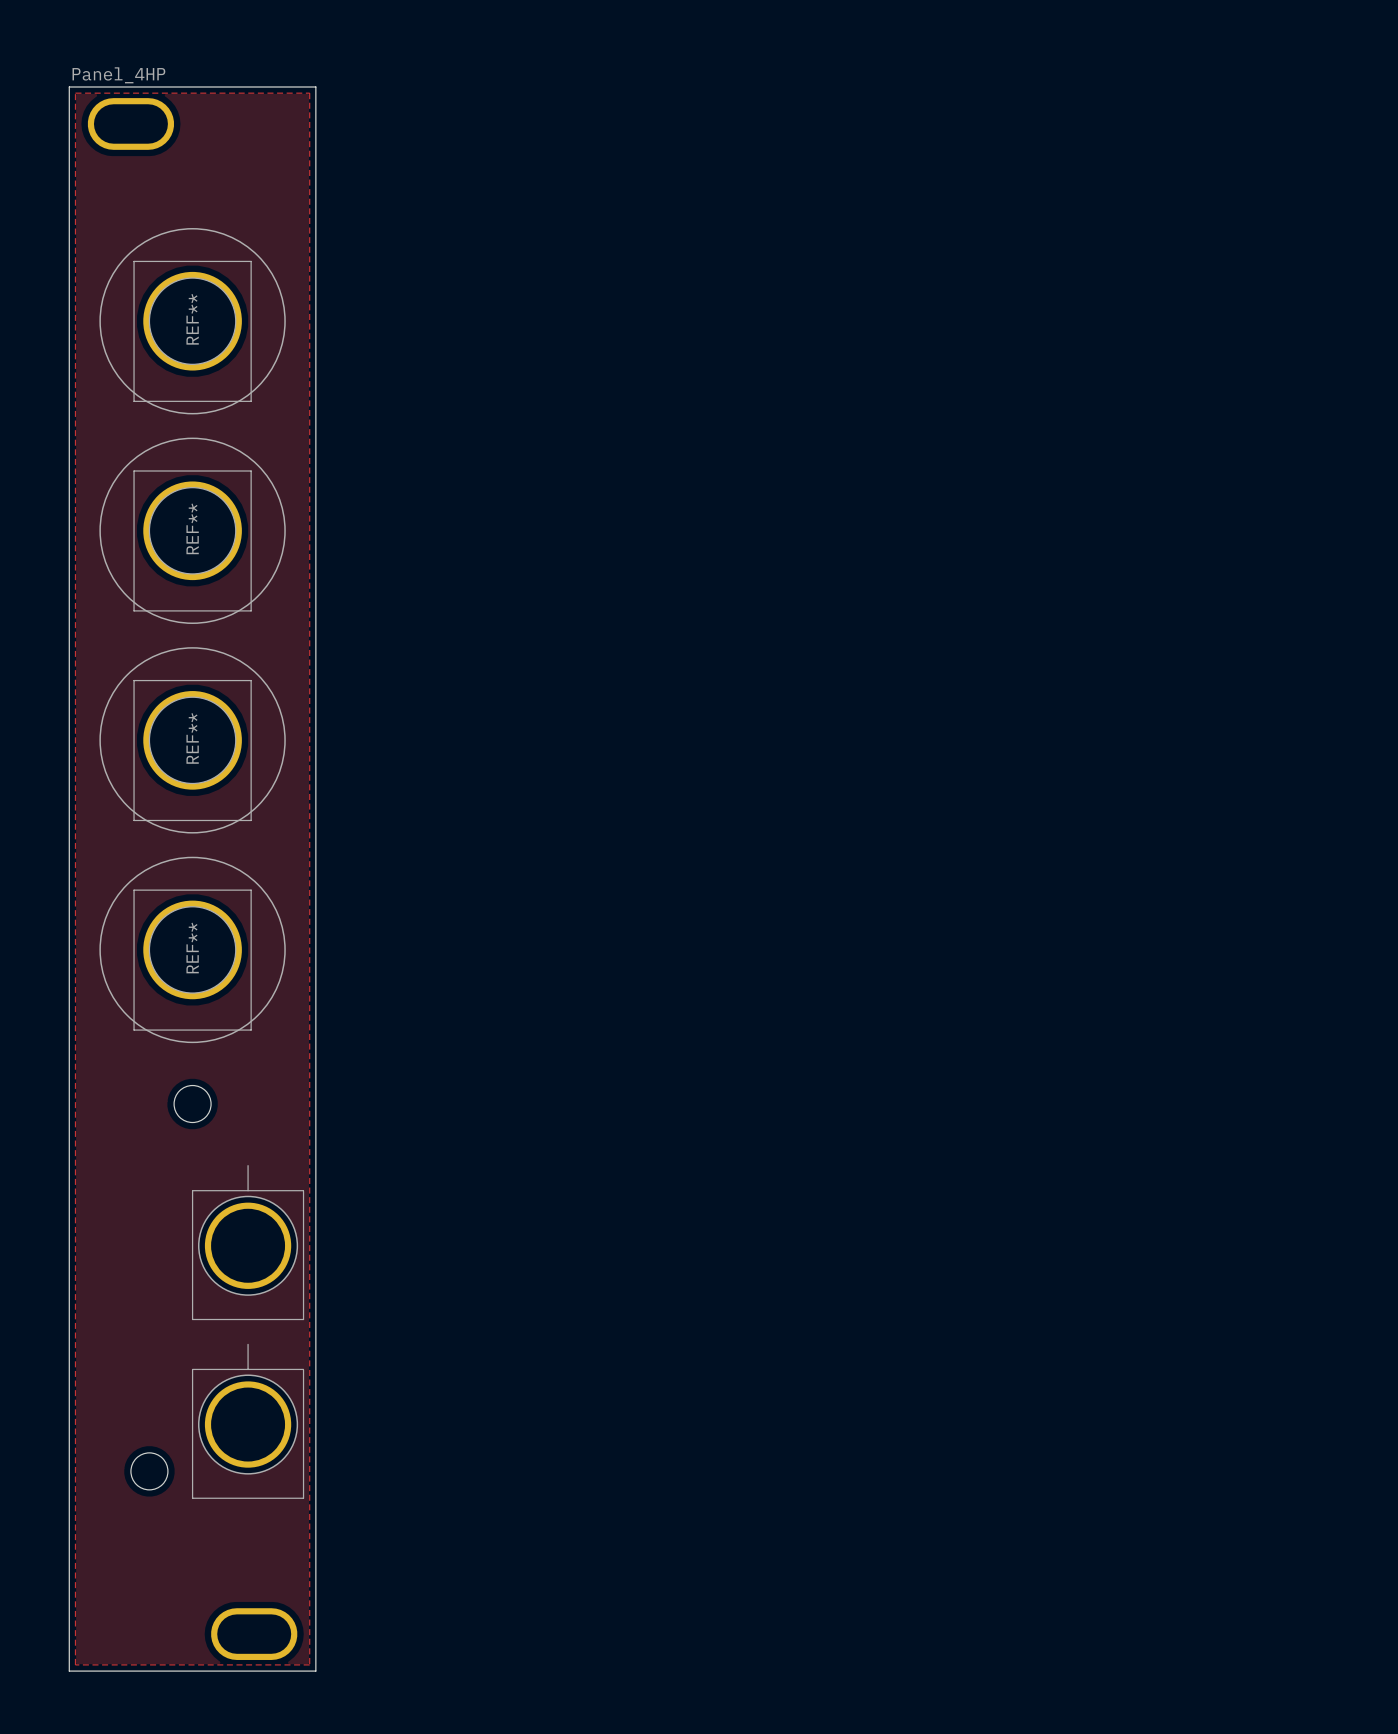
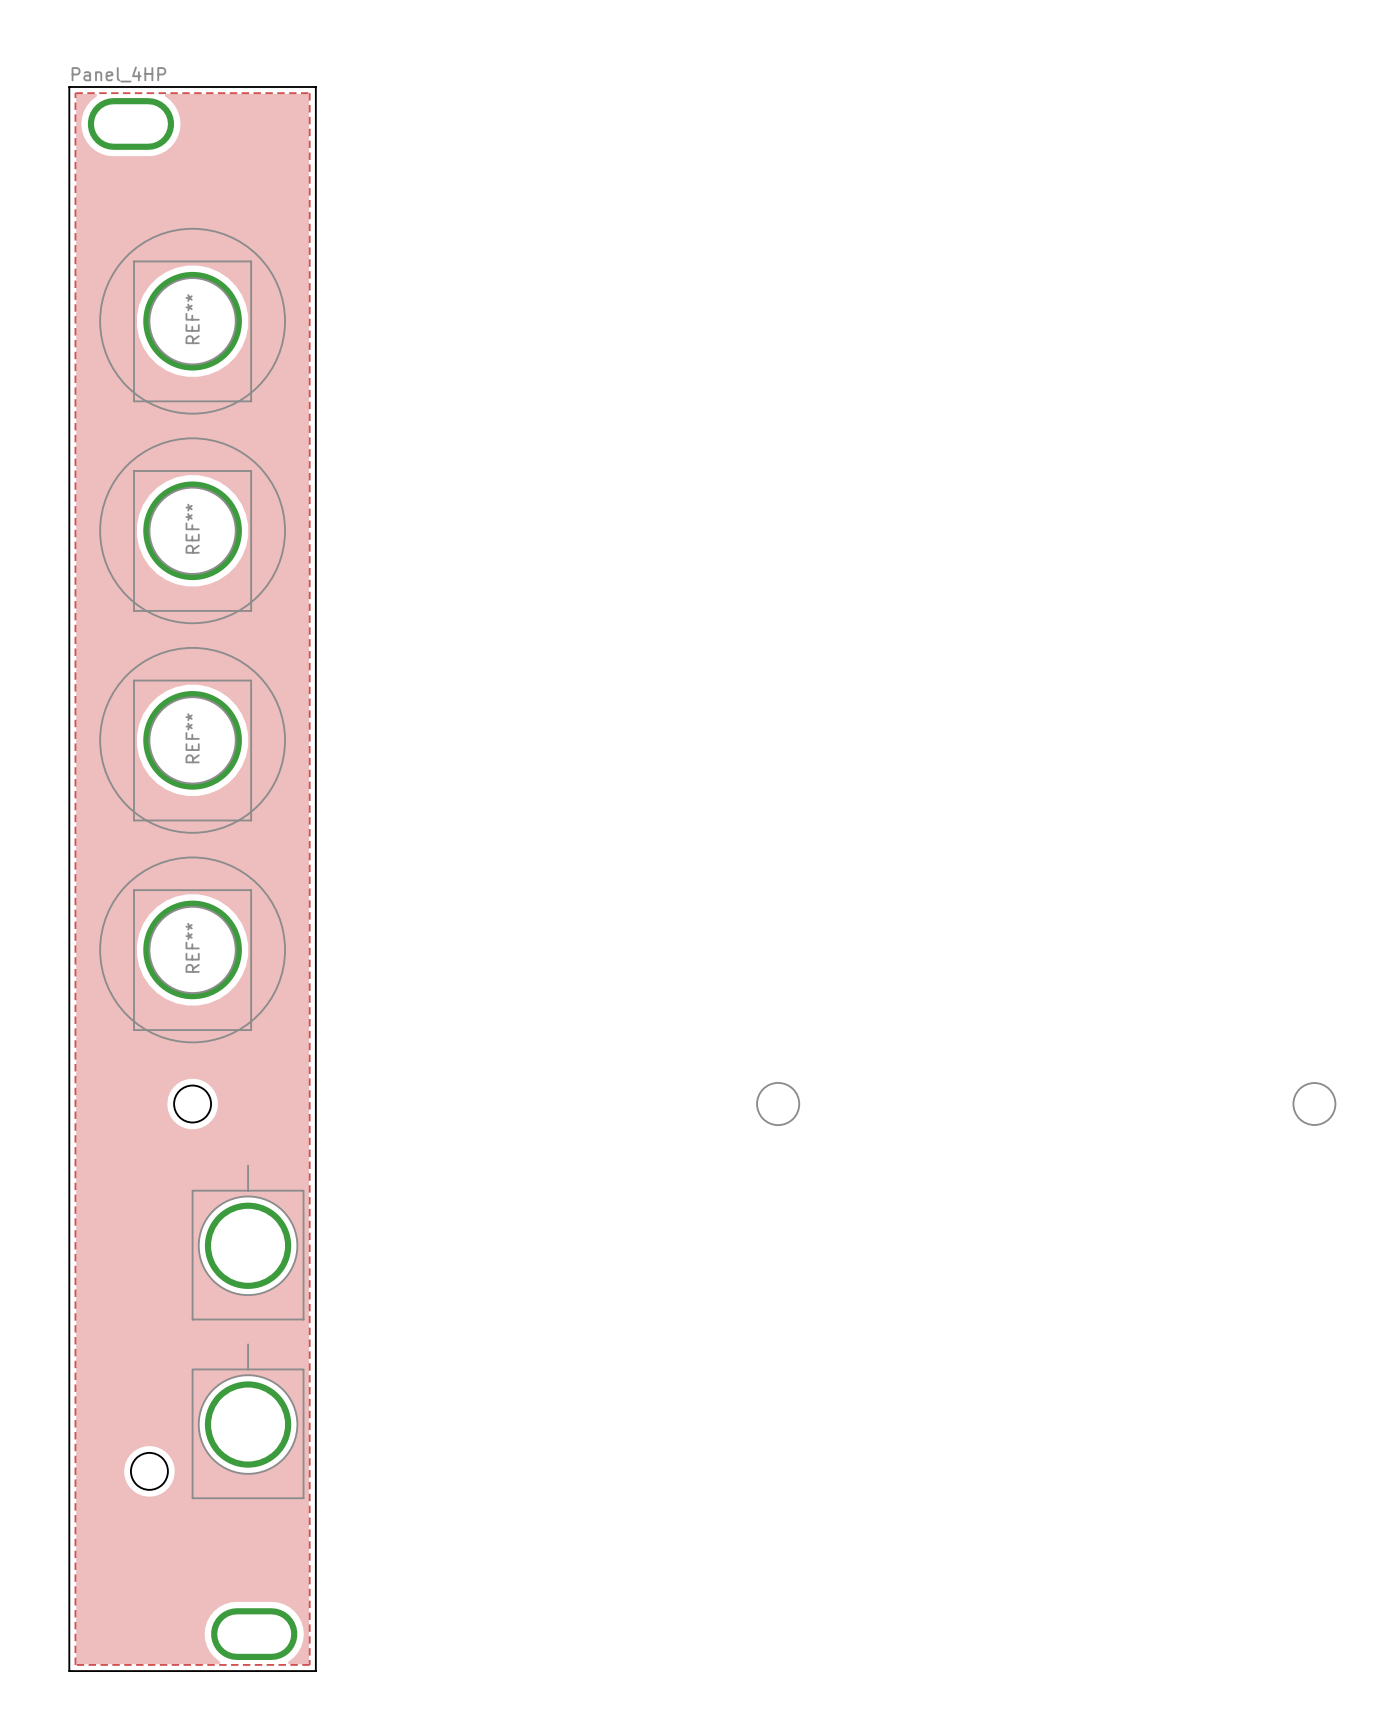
drawing: none -> [756, 1081, 801, 1127]
drawing: none -> [1292, 1082, 1337, 1126]

